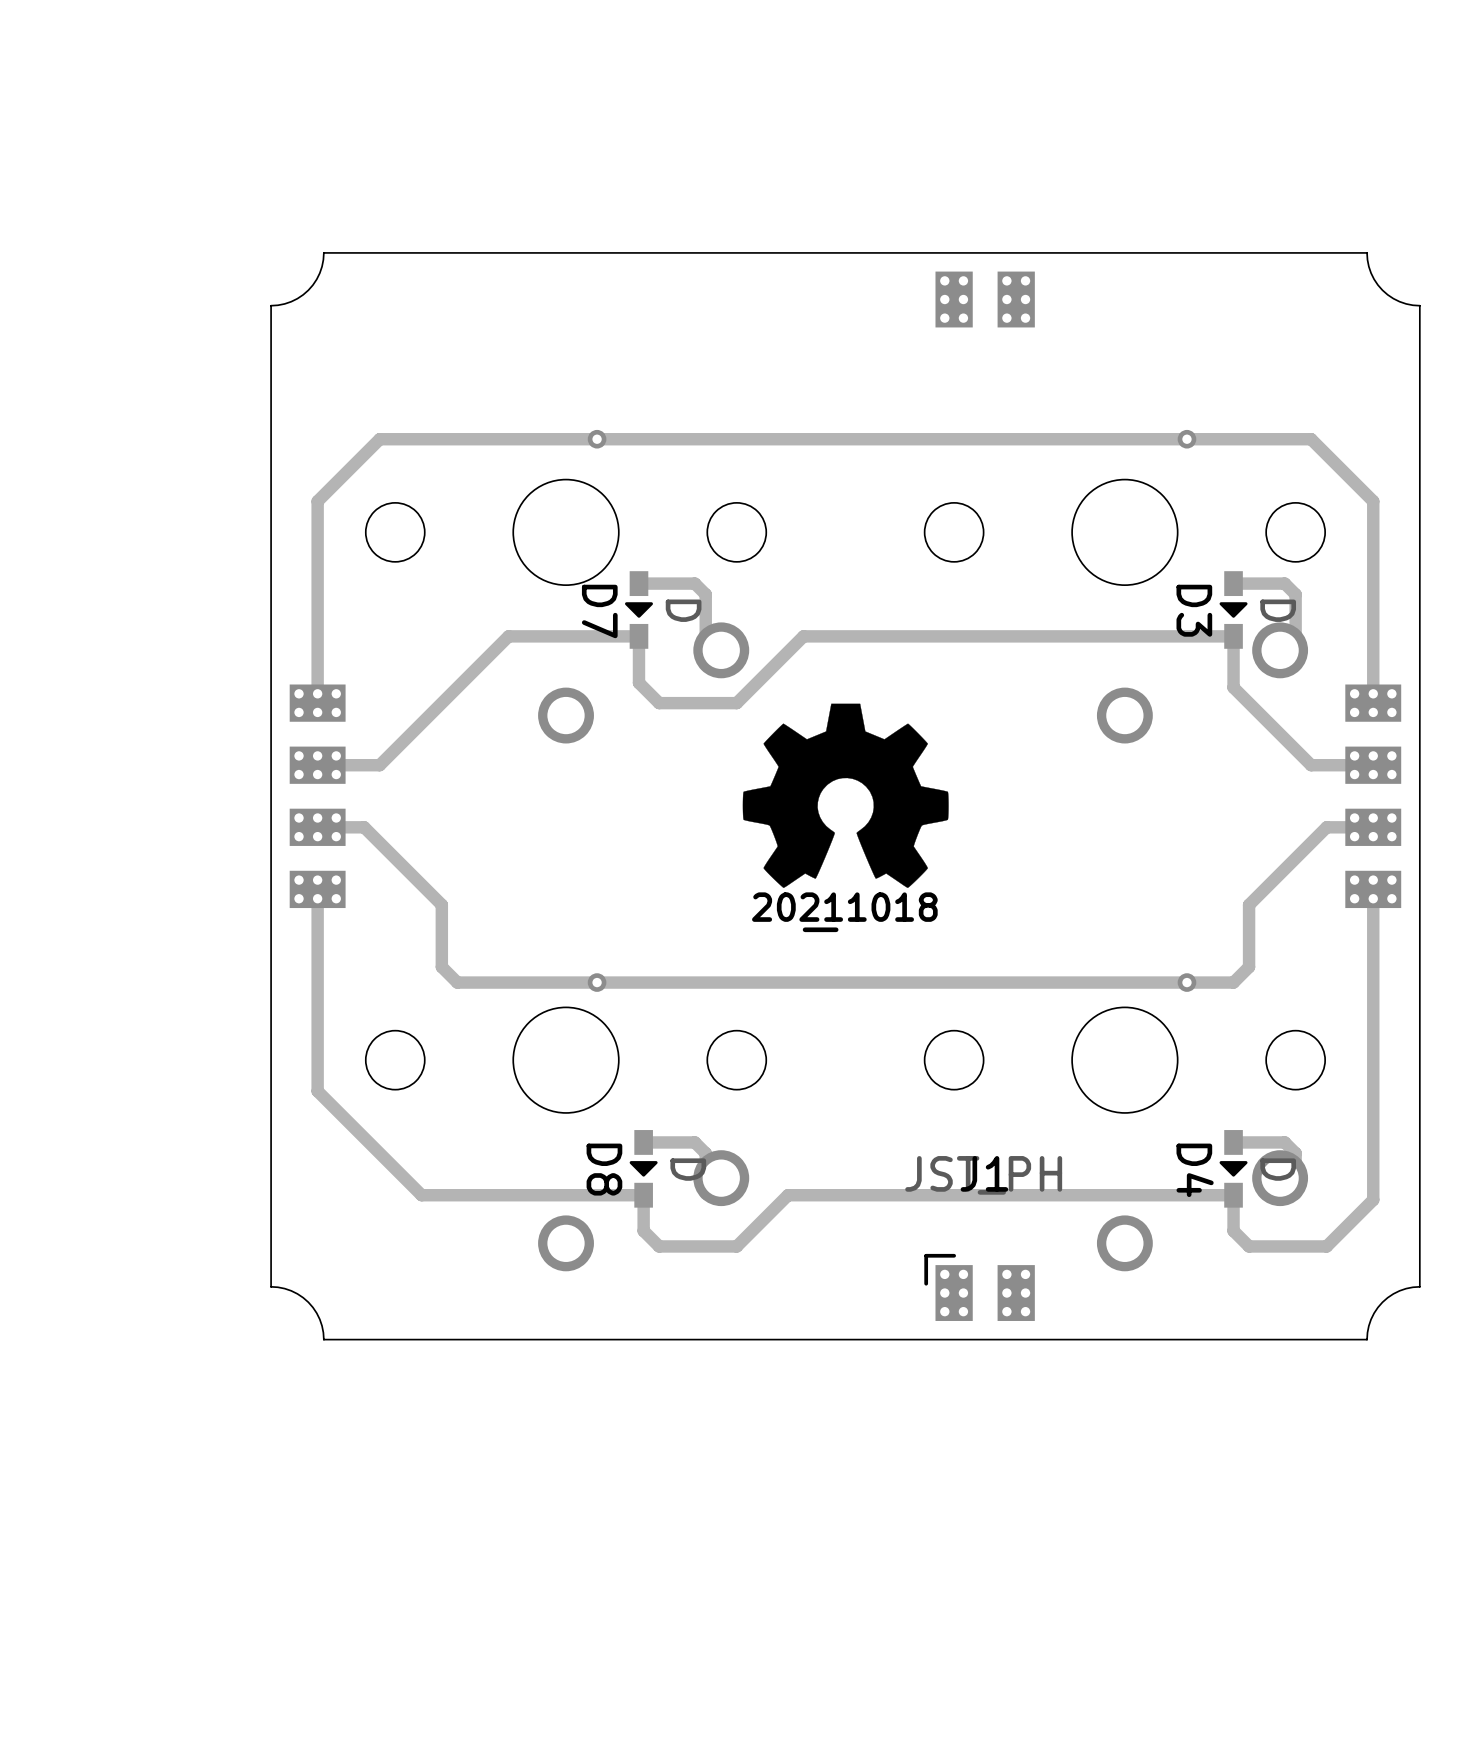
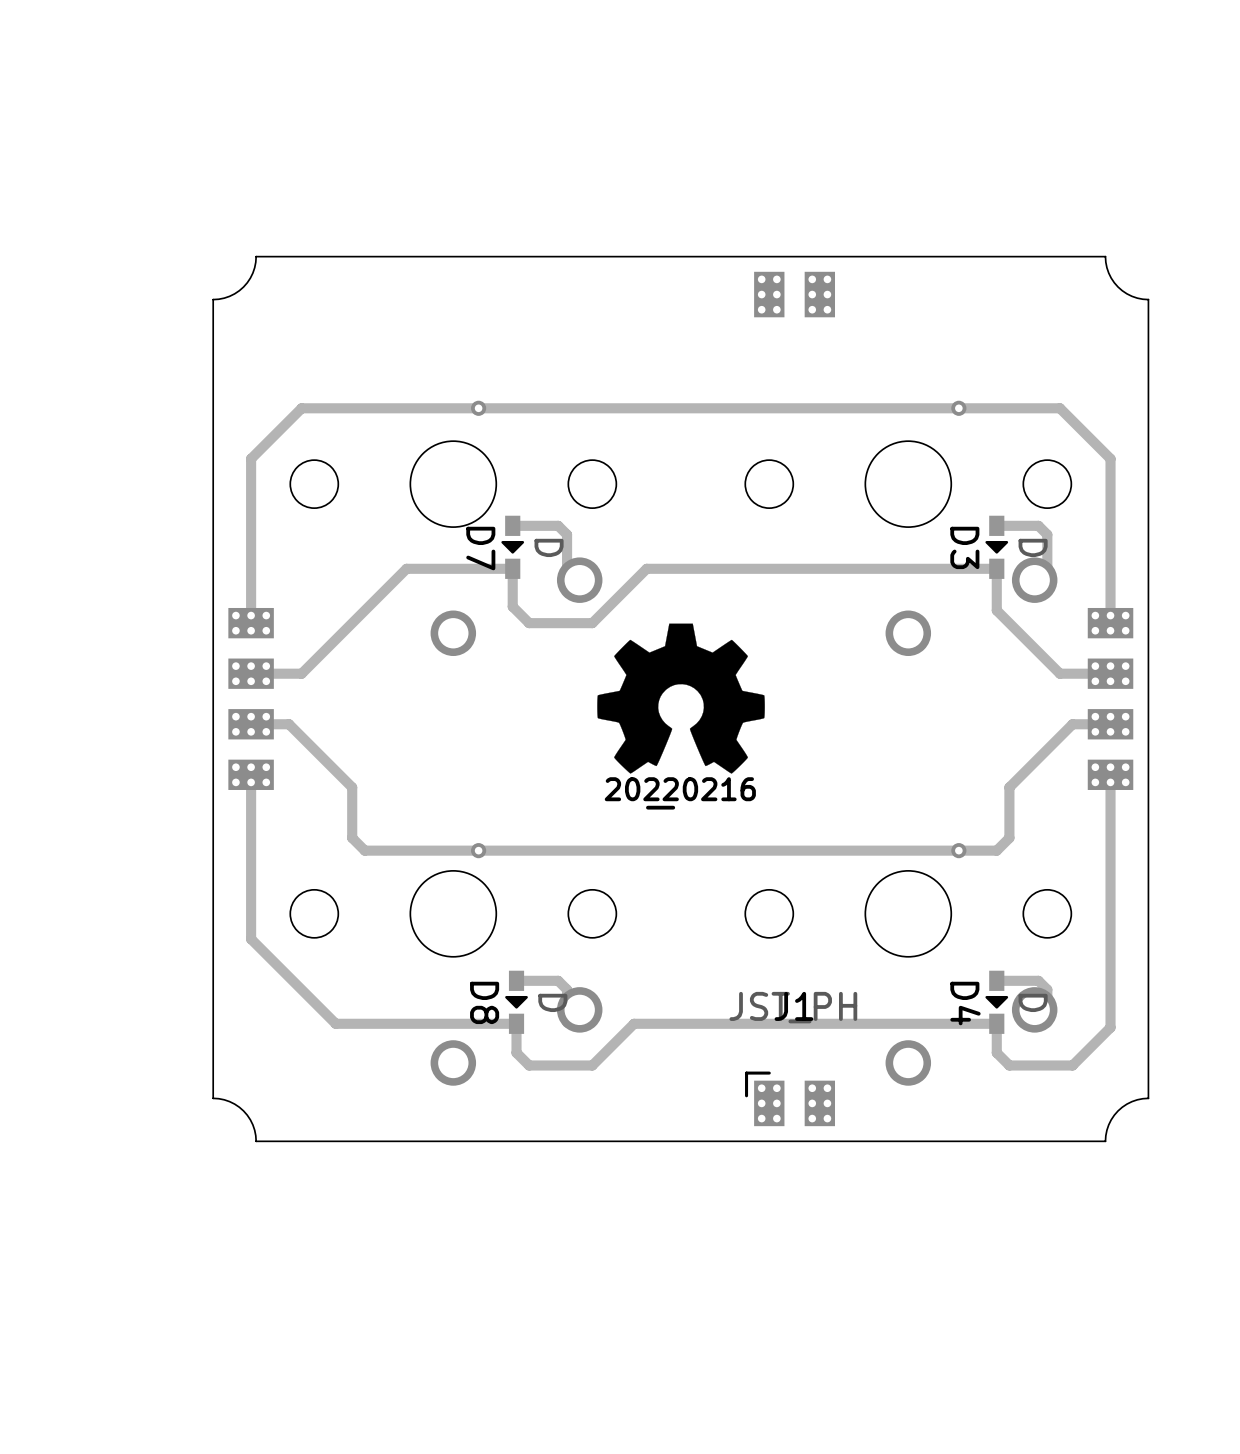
drawing shape: [752, 892, 938, 933] -> [604, 777, 756, 810]

